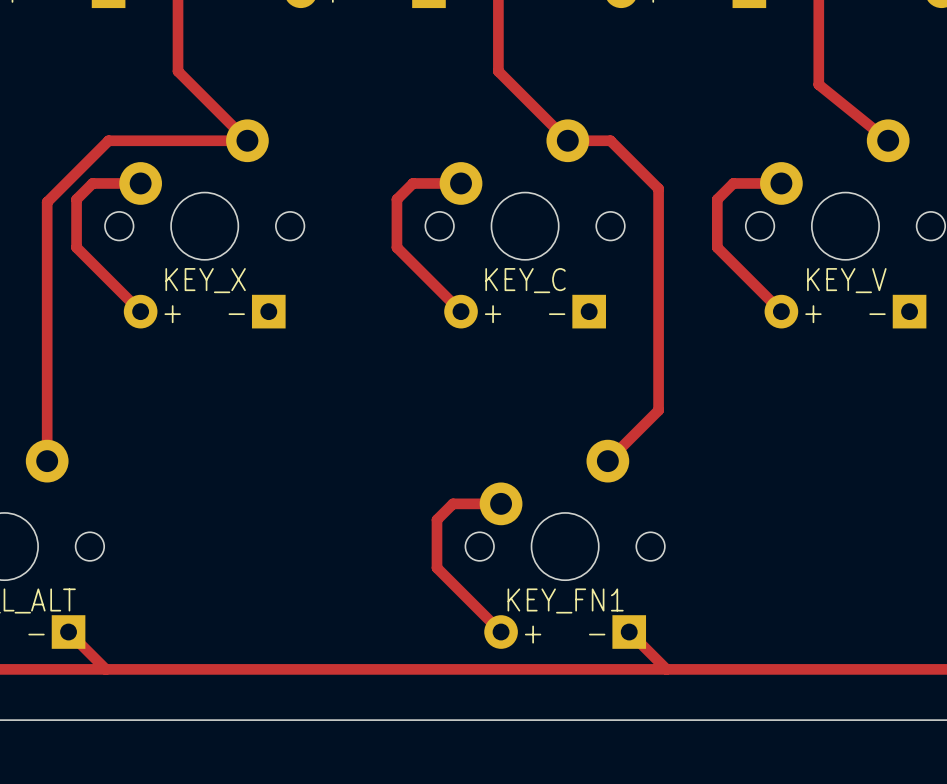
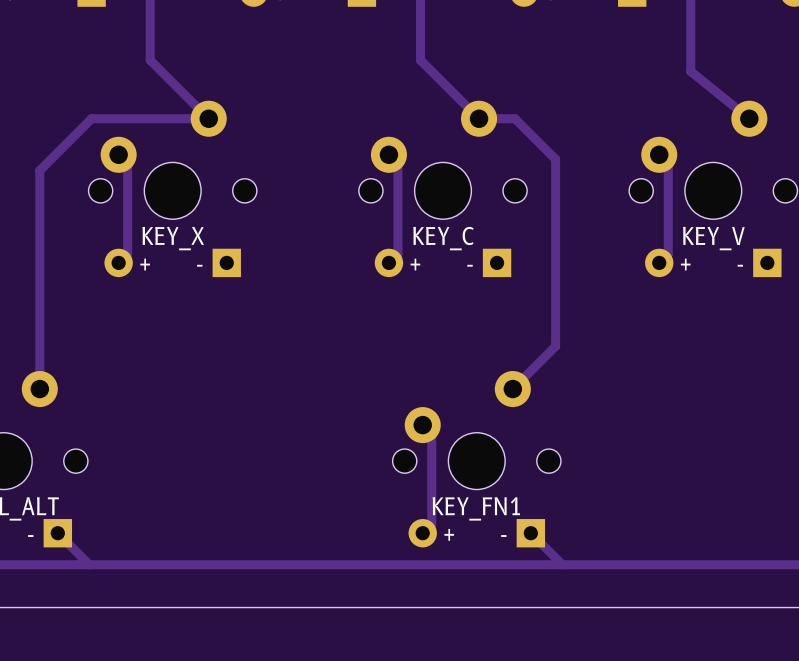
track: (140, 183) (92, 183) (76, 199) (76, 247) (140, 311) -> (118, 154) (127, 163) (127, 253) (118, 262)
track: (461, 183) (412, 183) (396, 199) (396, 247) (461, 311) -> (388, 154) (397, 163) (397, 253) (388, 262)
track: (781, 183) (733, 183) (717, 199) (717, 247) (781, 311) -> (659, 154) (668, 163) (668, 253) (659, 262)
track: (501, 503) (453, 503) (436, 519) (436, 567) (501, 632) -> (422, 425) (431, 434) (431, 524) (422, 533)

